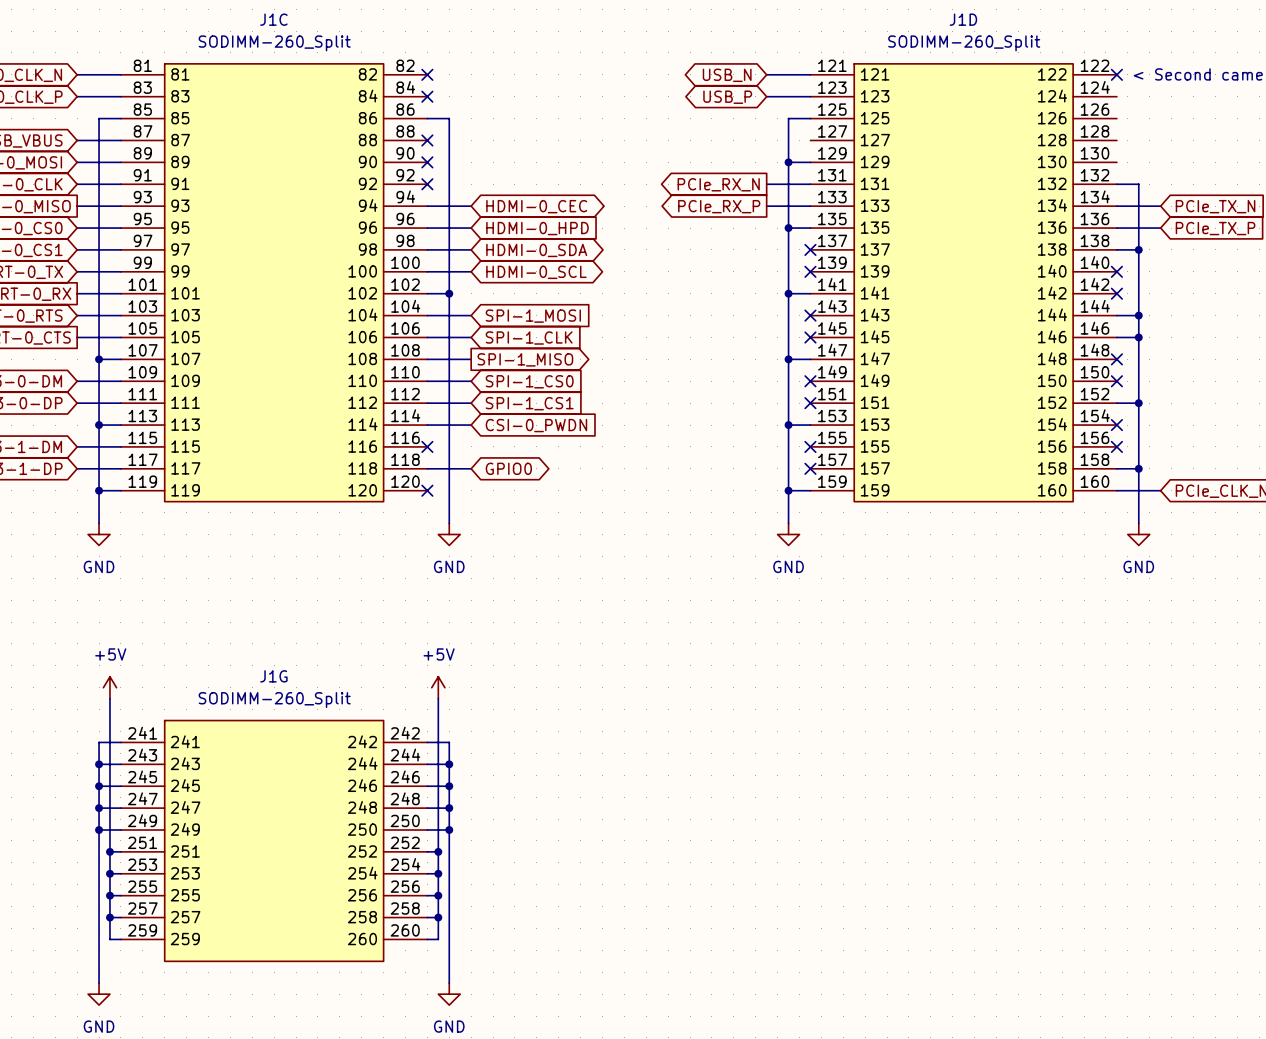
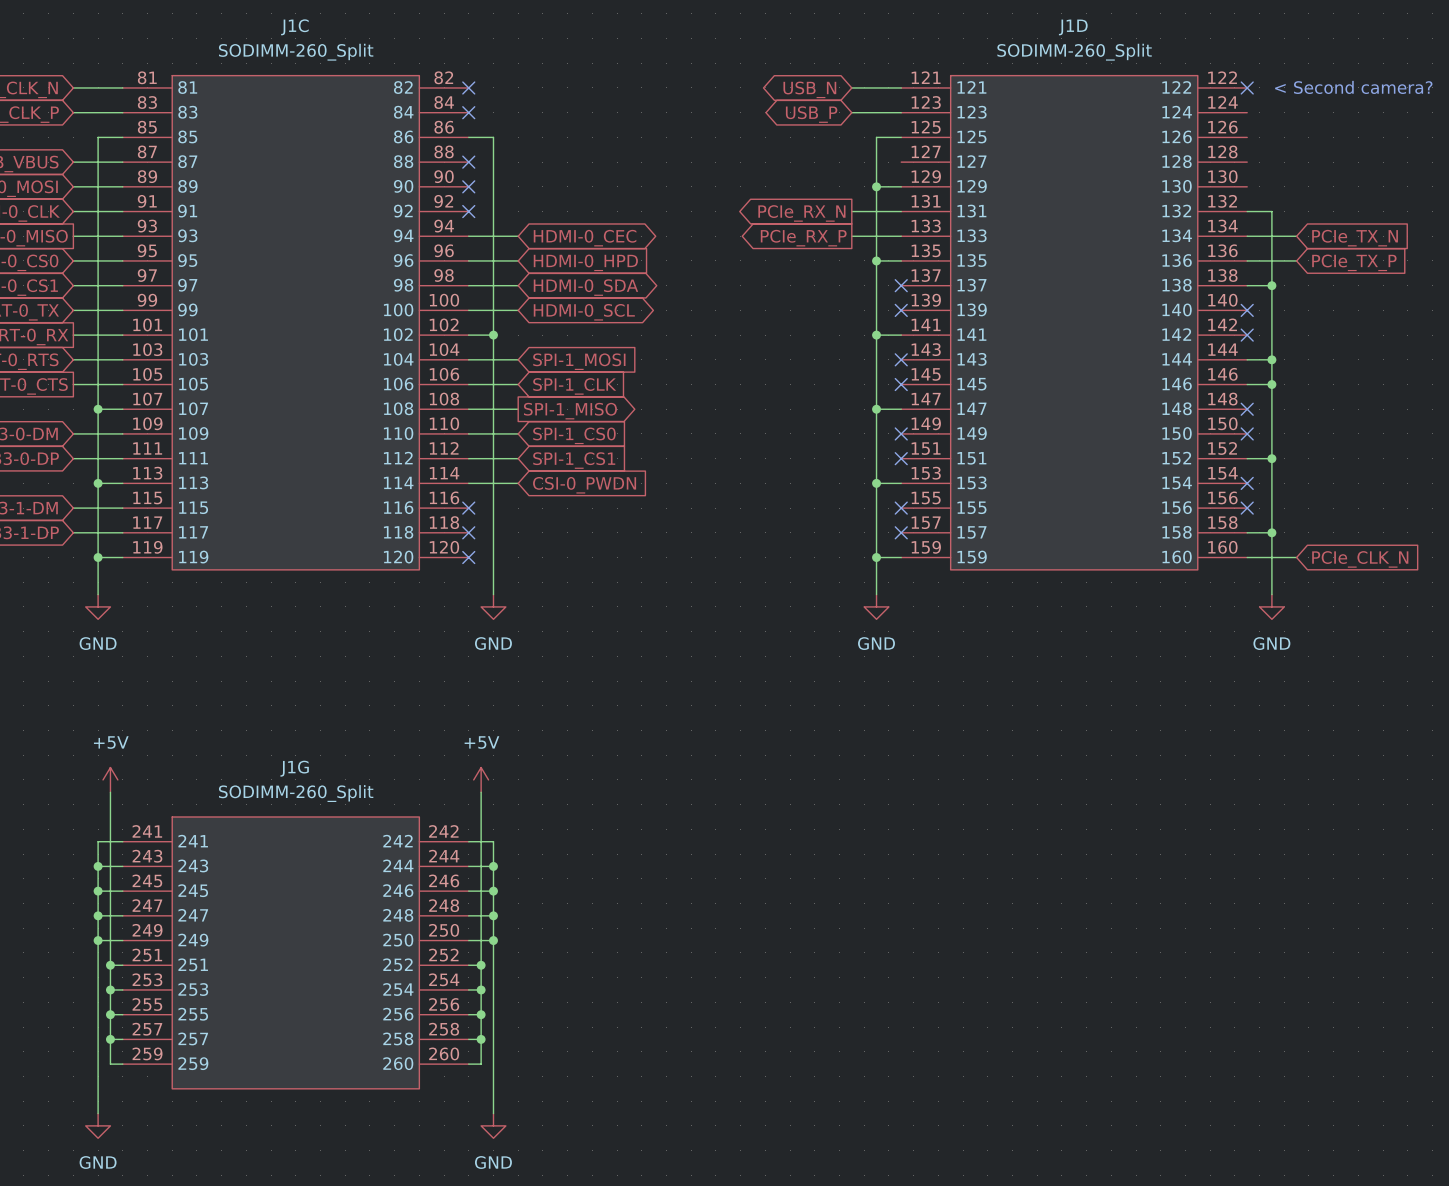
wire: (427, 468) (471, 468) -> none
no-connect mark: none -> (468, 532)
global label: GPIO0 (508, 468) -> none

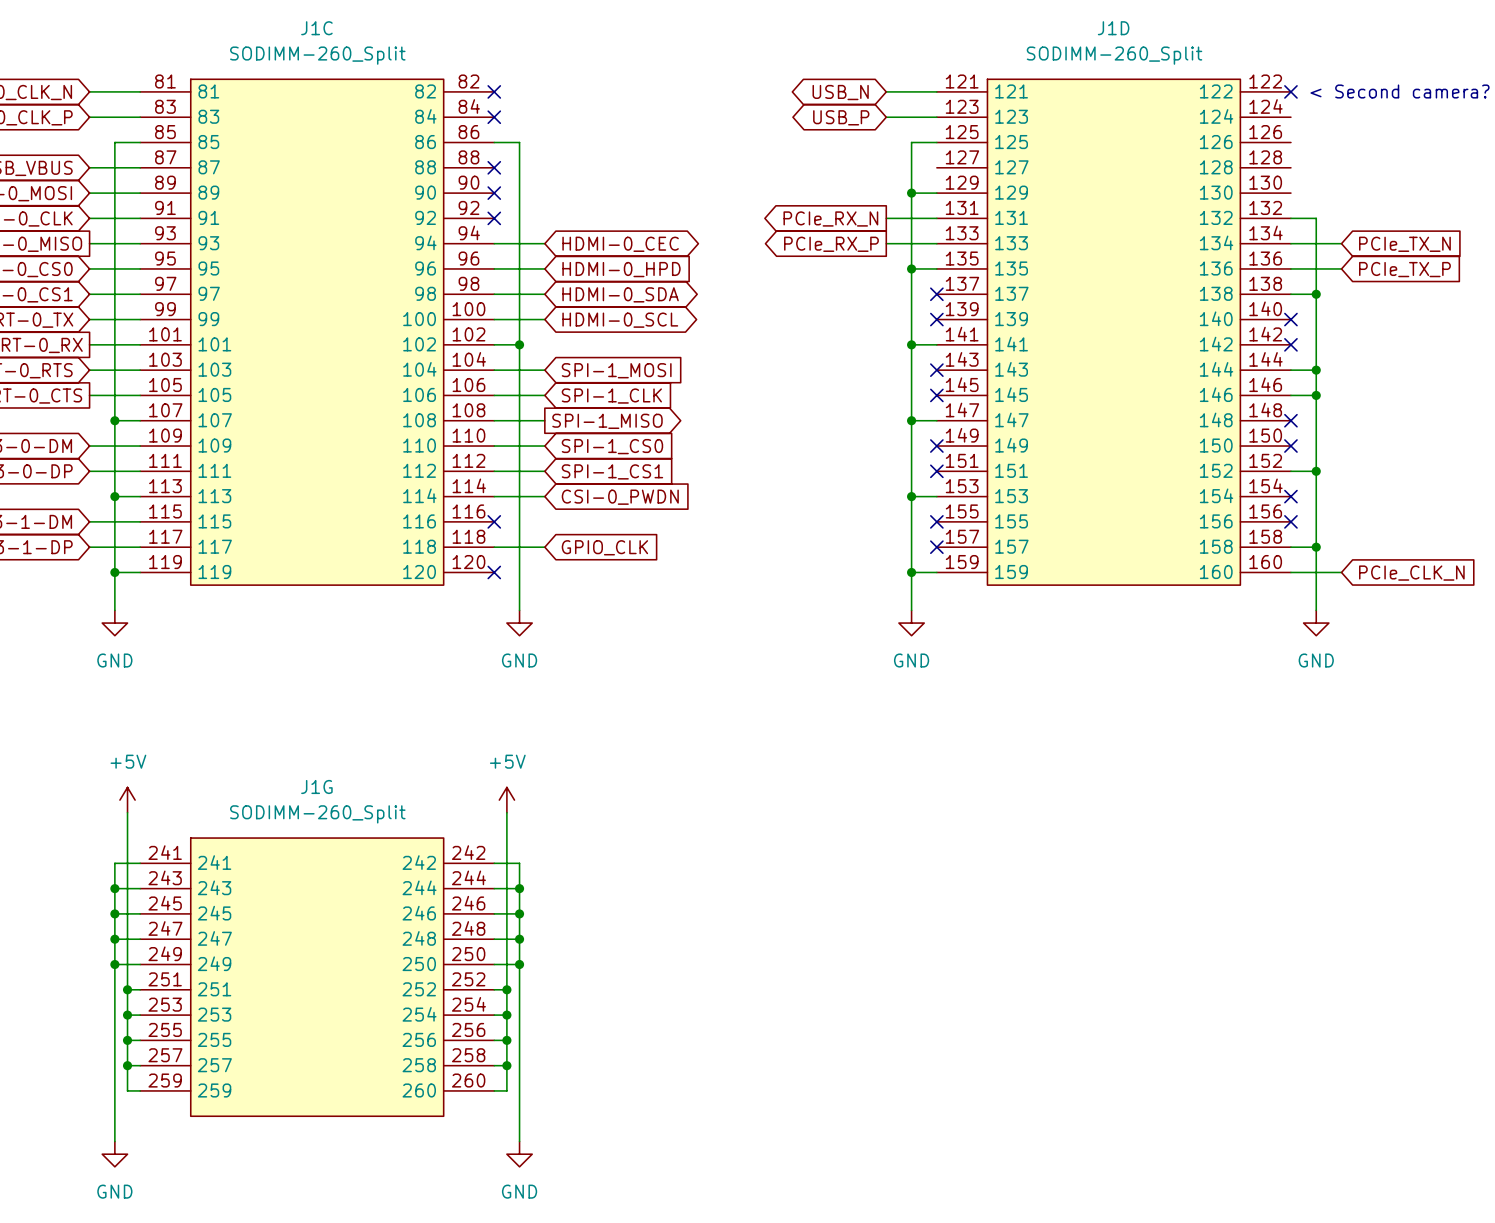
wire: none -> (494, 547) (544, 547)
no-connect mark: (468, 532) -> none
global label: none -> GPIO_CLK (604, 547)

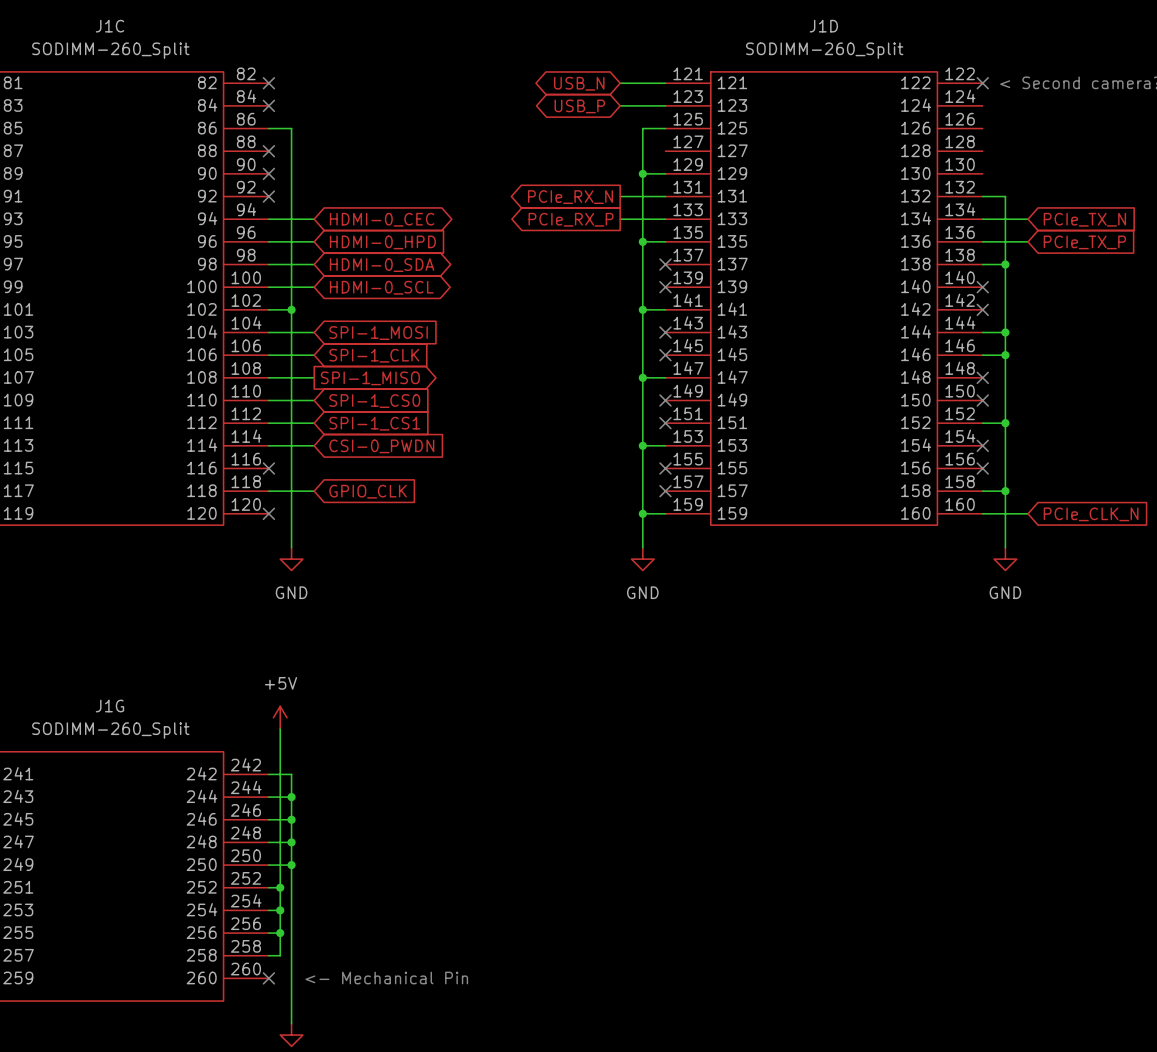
wire: (506, 1065) (506, 1090) (494, 1090) -> none
junction: (506, 1065) -> none
no-connect mark: none -> (268, 978)
text: none -> <- Mechanical Pin (386, 978)

